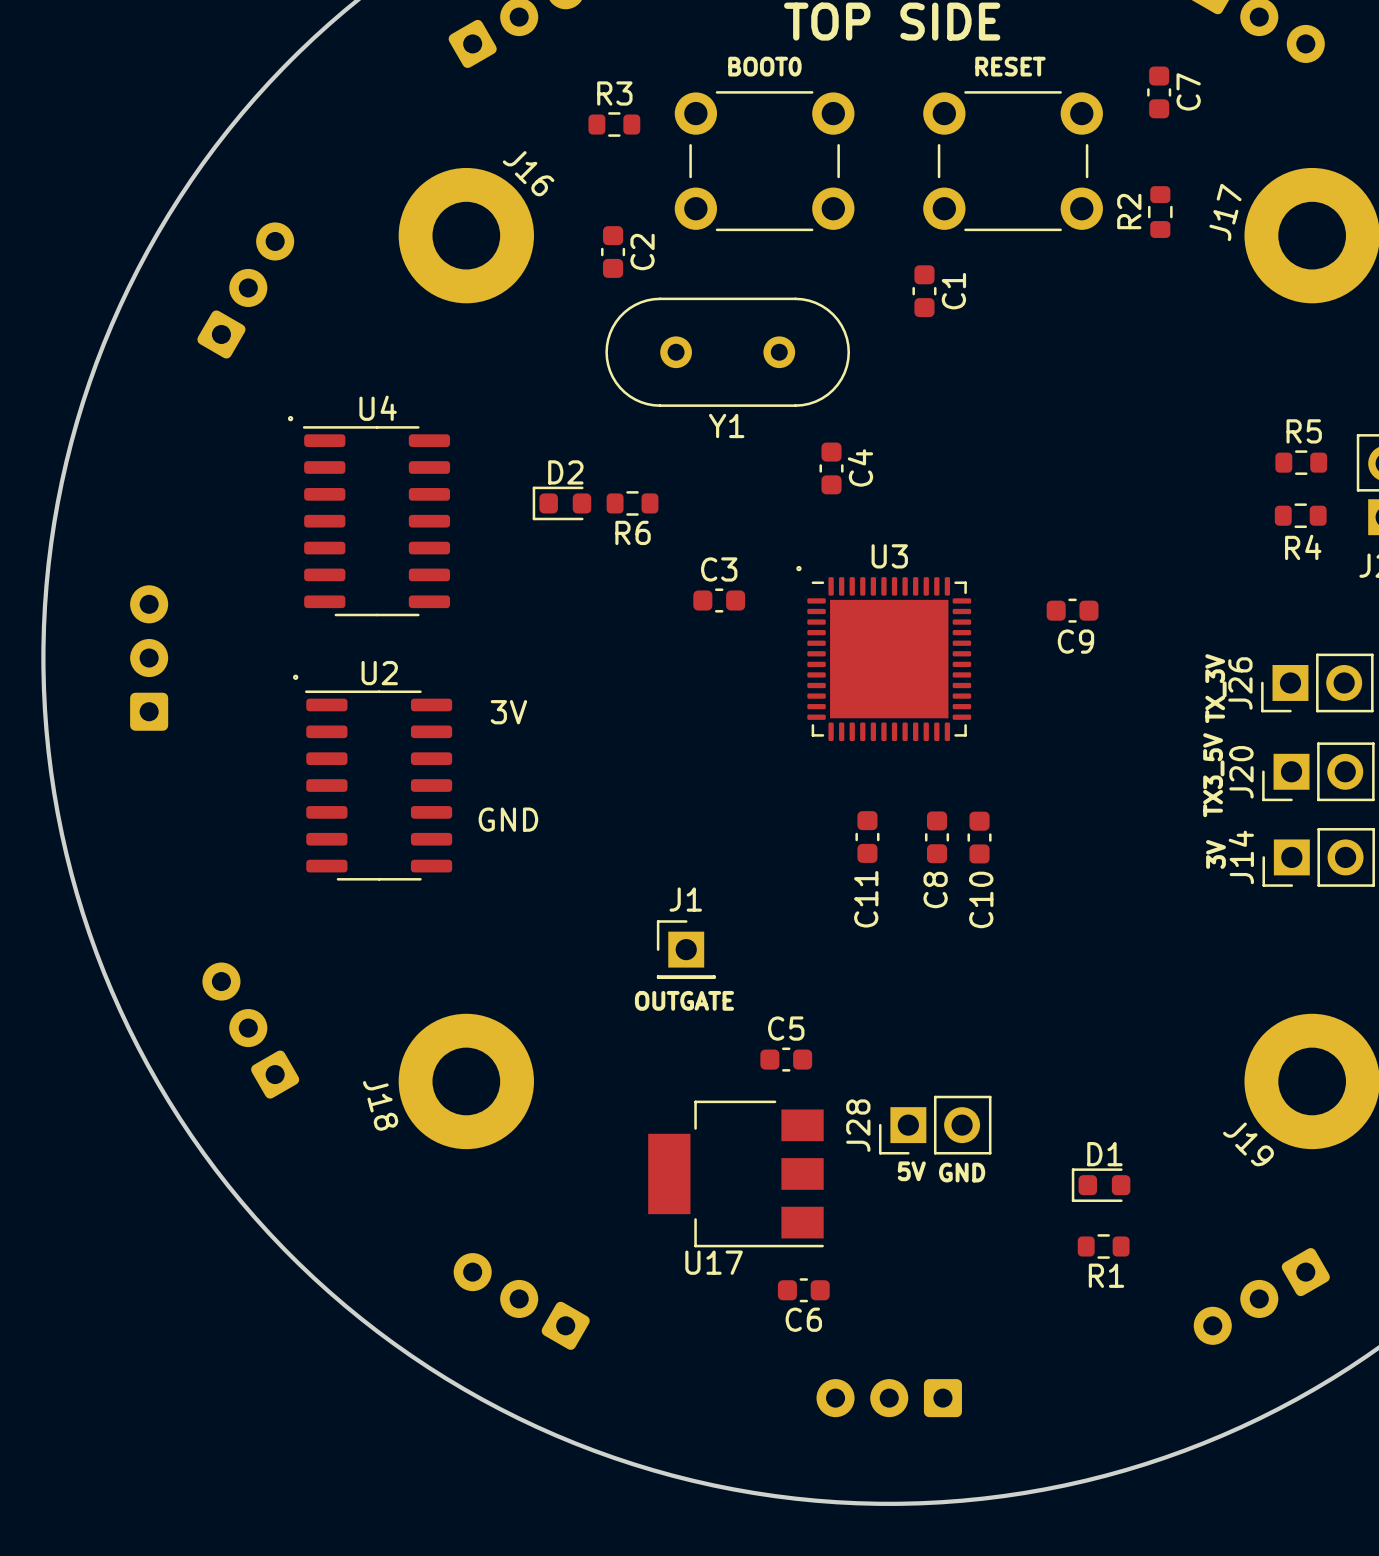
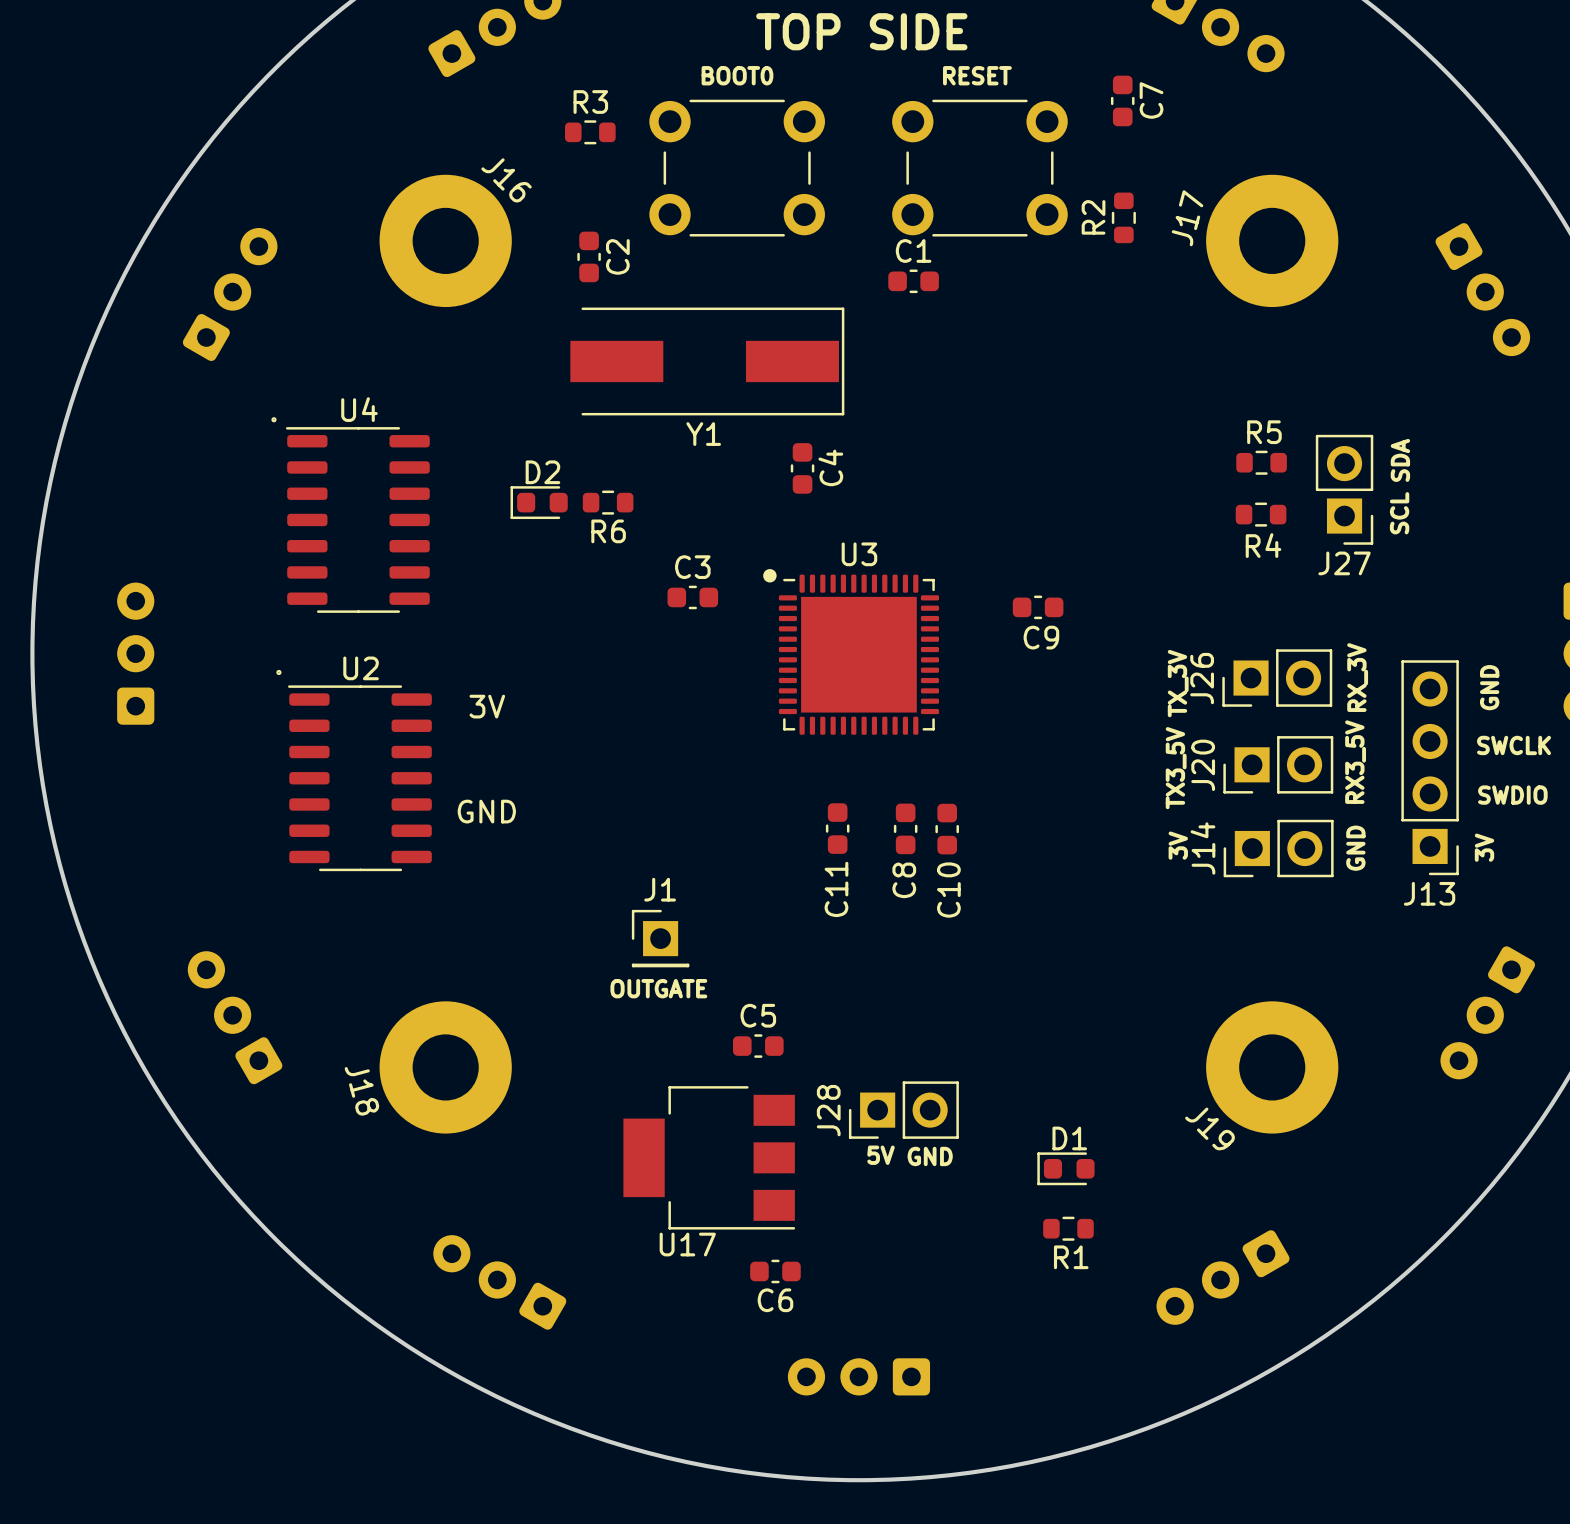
C1 rotation: 0° (924, 291) -> 90° clockwise (913, 281)
C1 name position: C1 (953, 291) -> C1 (913, 250)
Y1 footprint: [605, 297, 851, 407] -> [570, 307, 845, 416]
drawing: [796, 565, 802, 572] -> none
drawing: none -> [763, 569, 777, 583]

